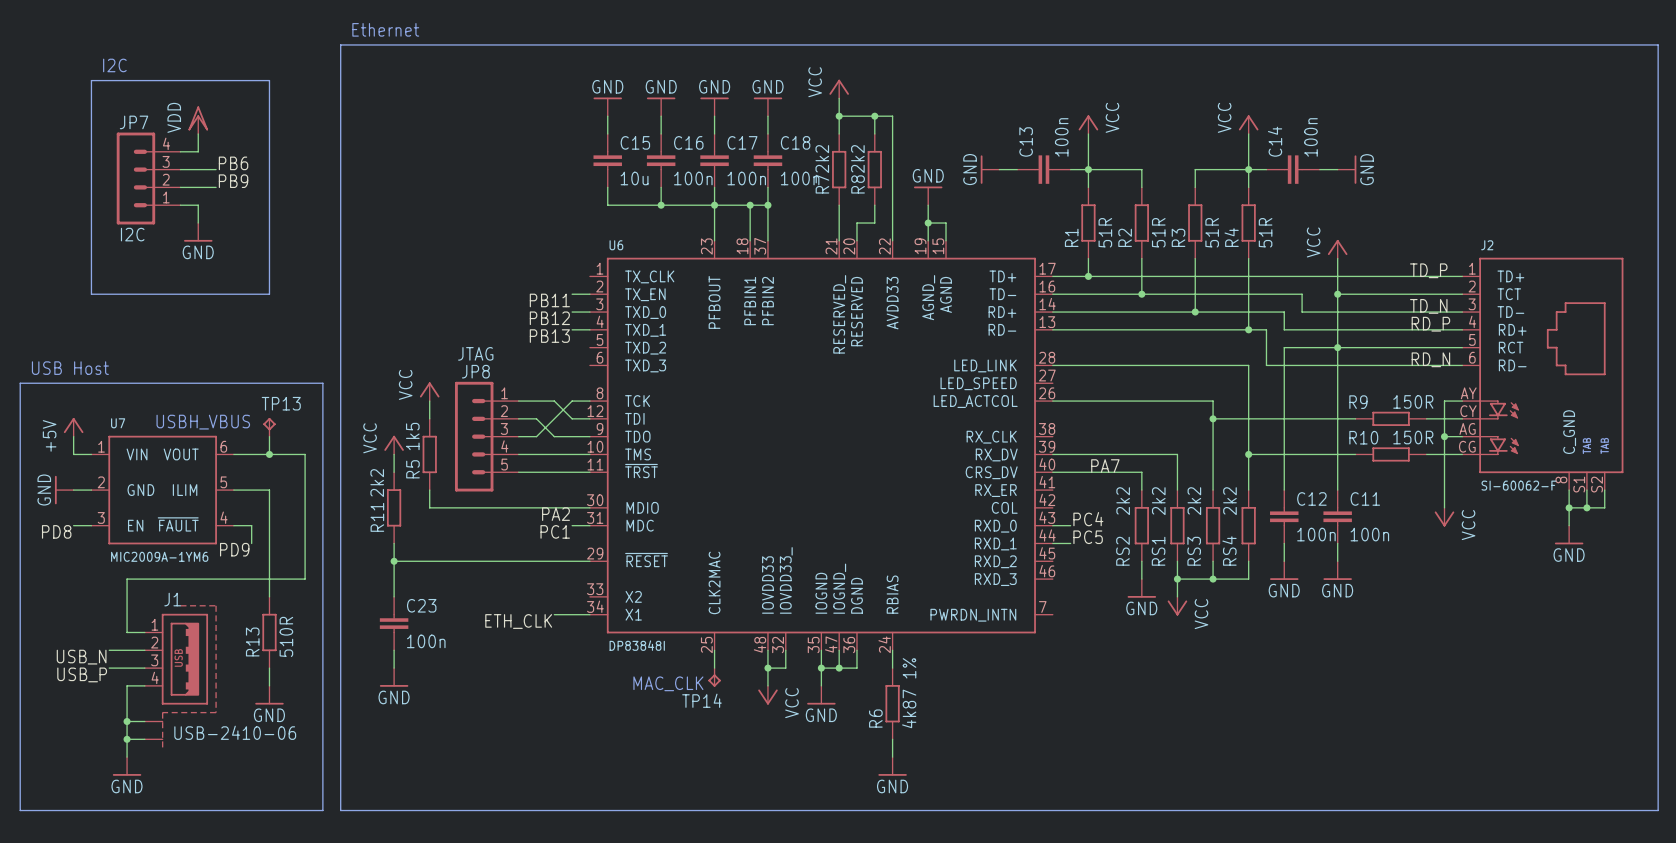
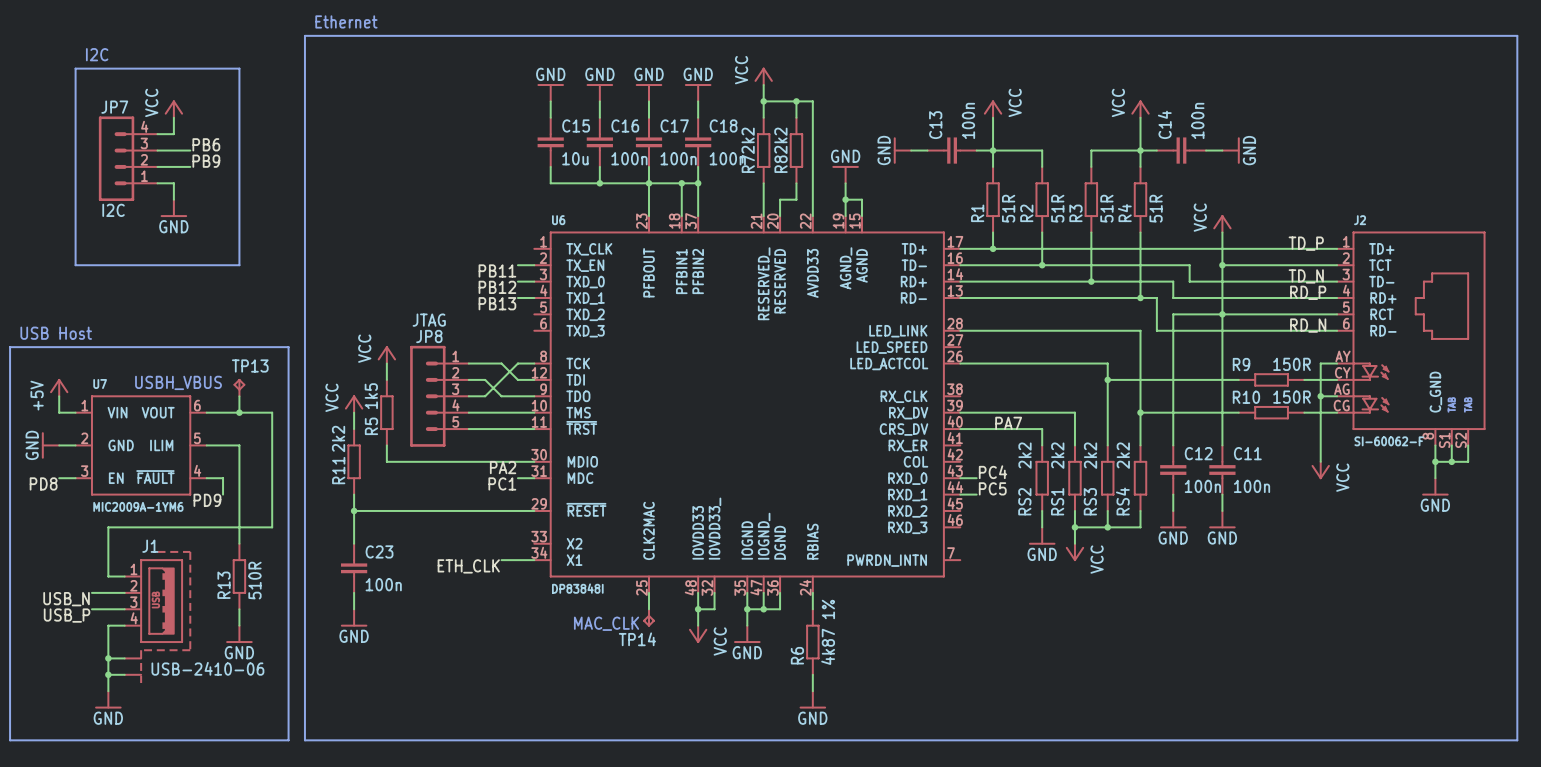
power symbol: VDD (198, 120) -> VCC (173, 109)

